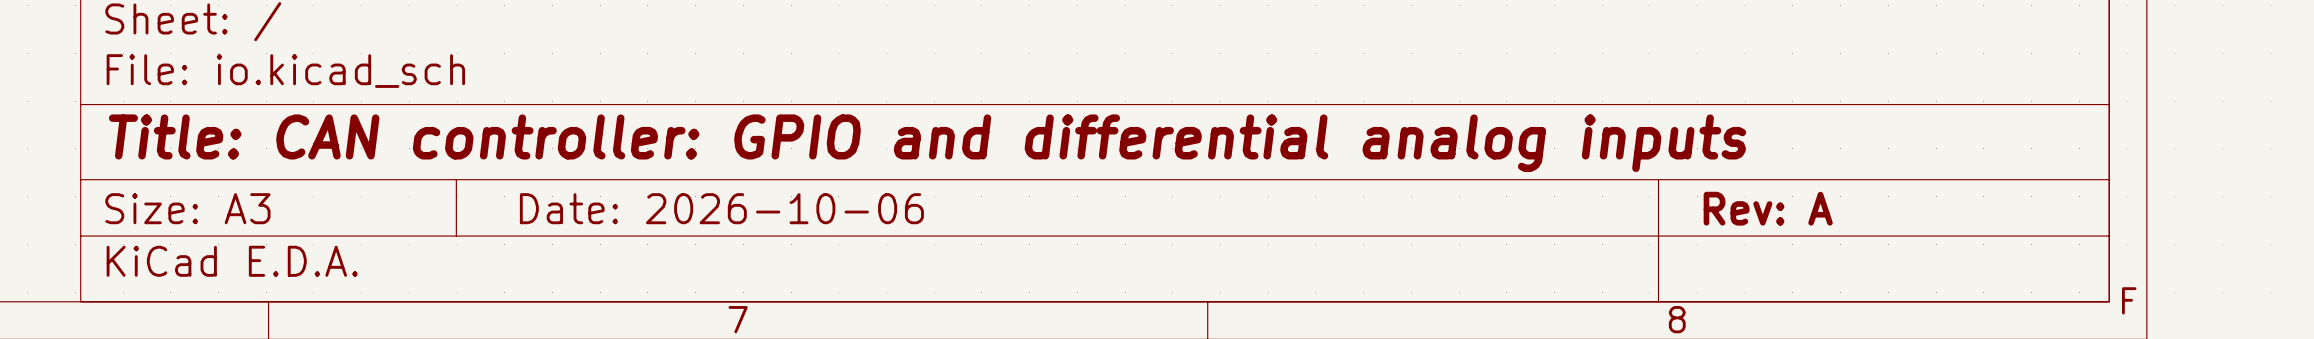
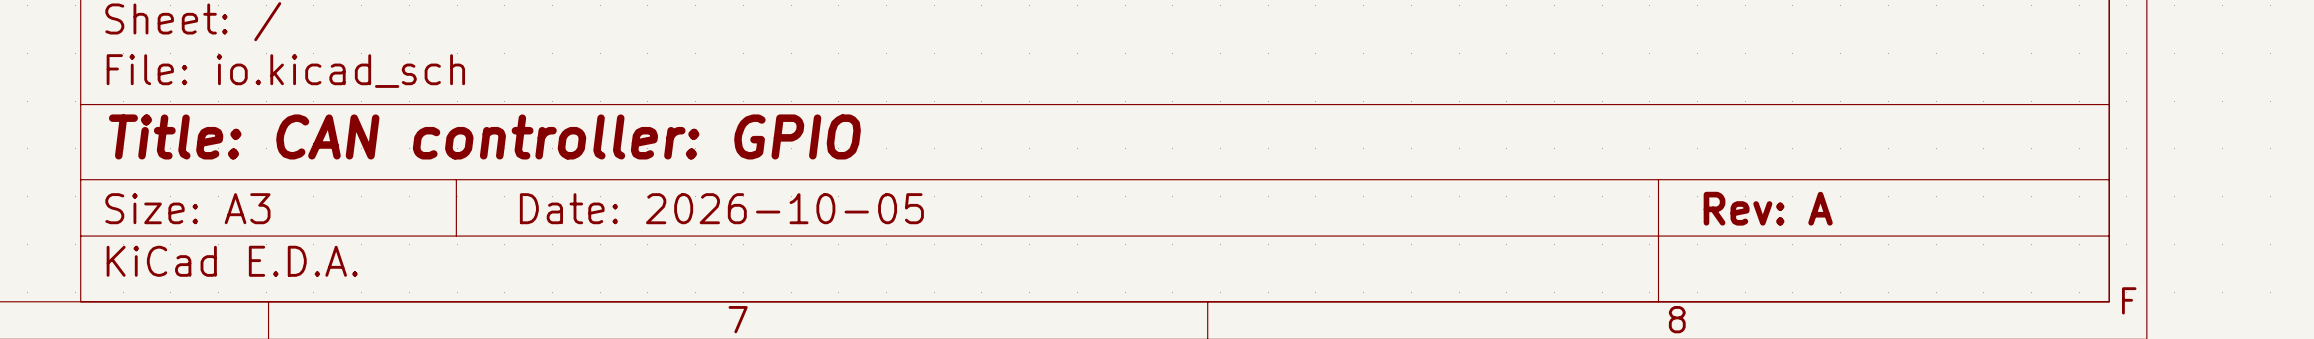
title block: Title: CAN controller: GPIO and differential analog inputs (927, 143) -> Title: CAN controller: GPIO (484, 136)
title block: Date: 2026-10-06 (721, 208) -> Date: 2026-10-05 (721, 208)

